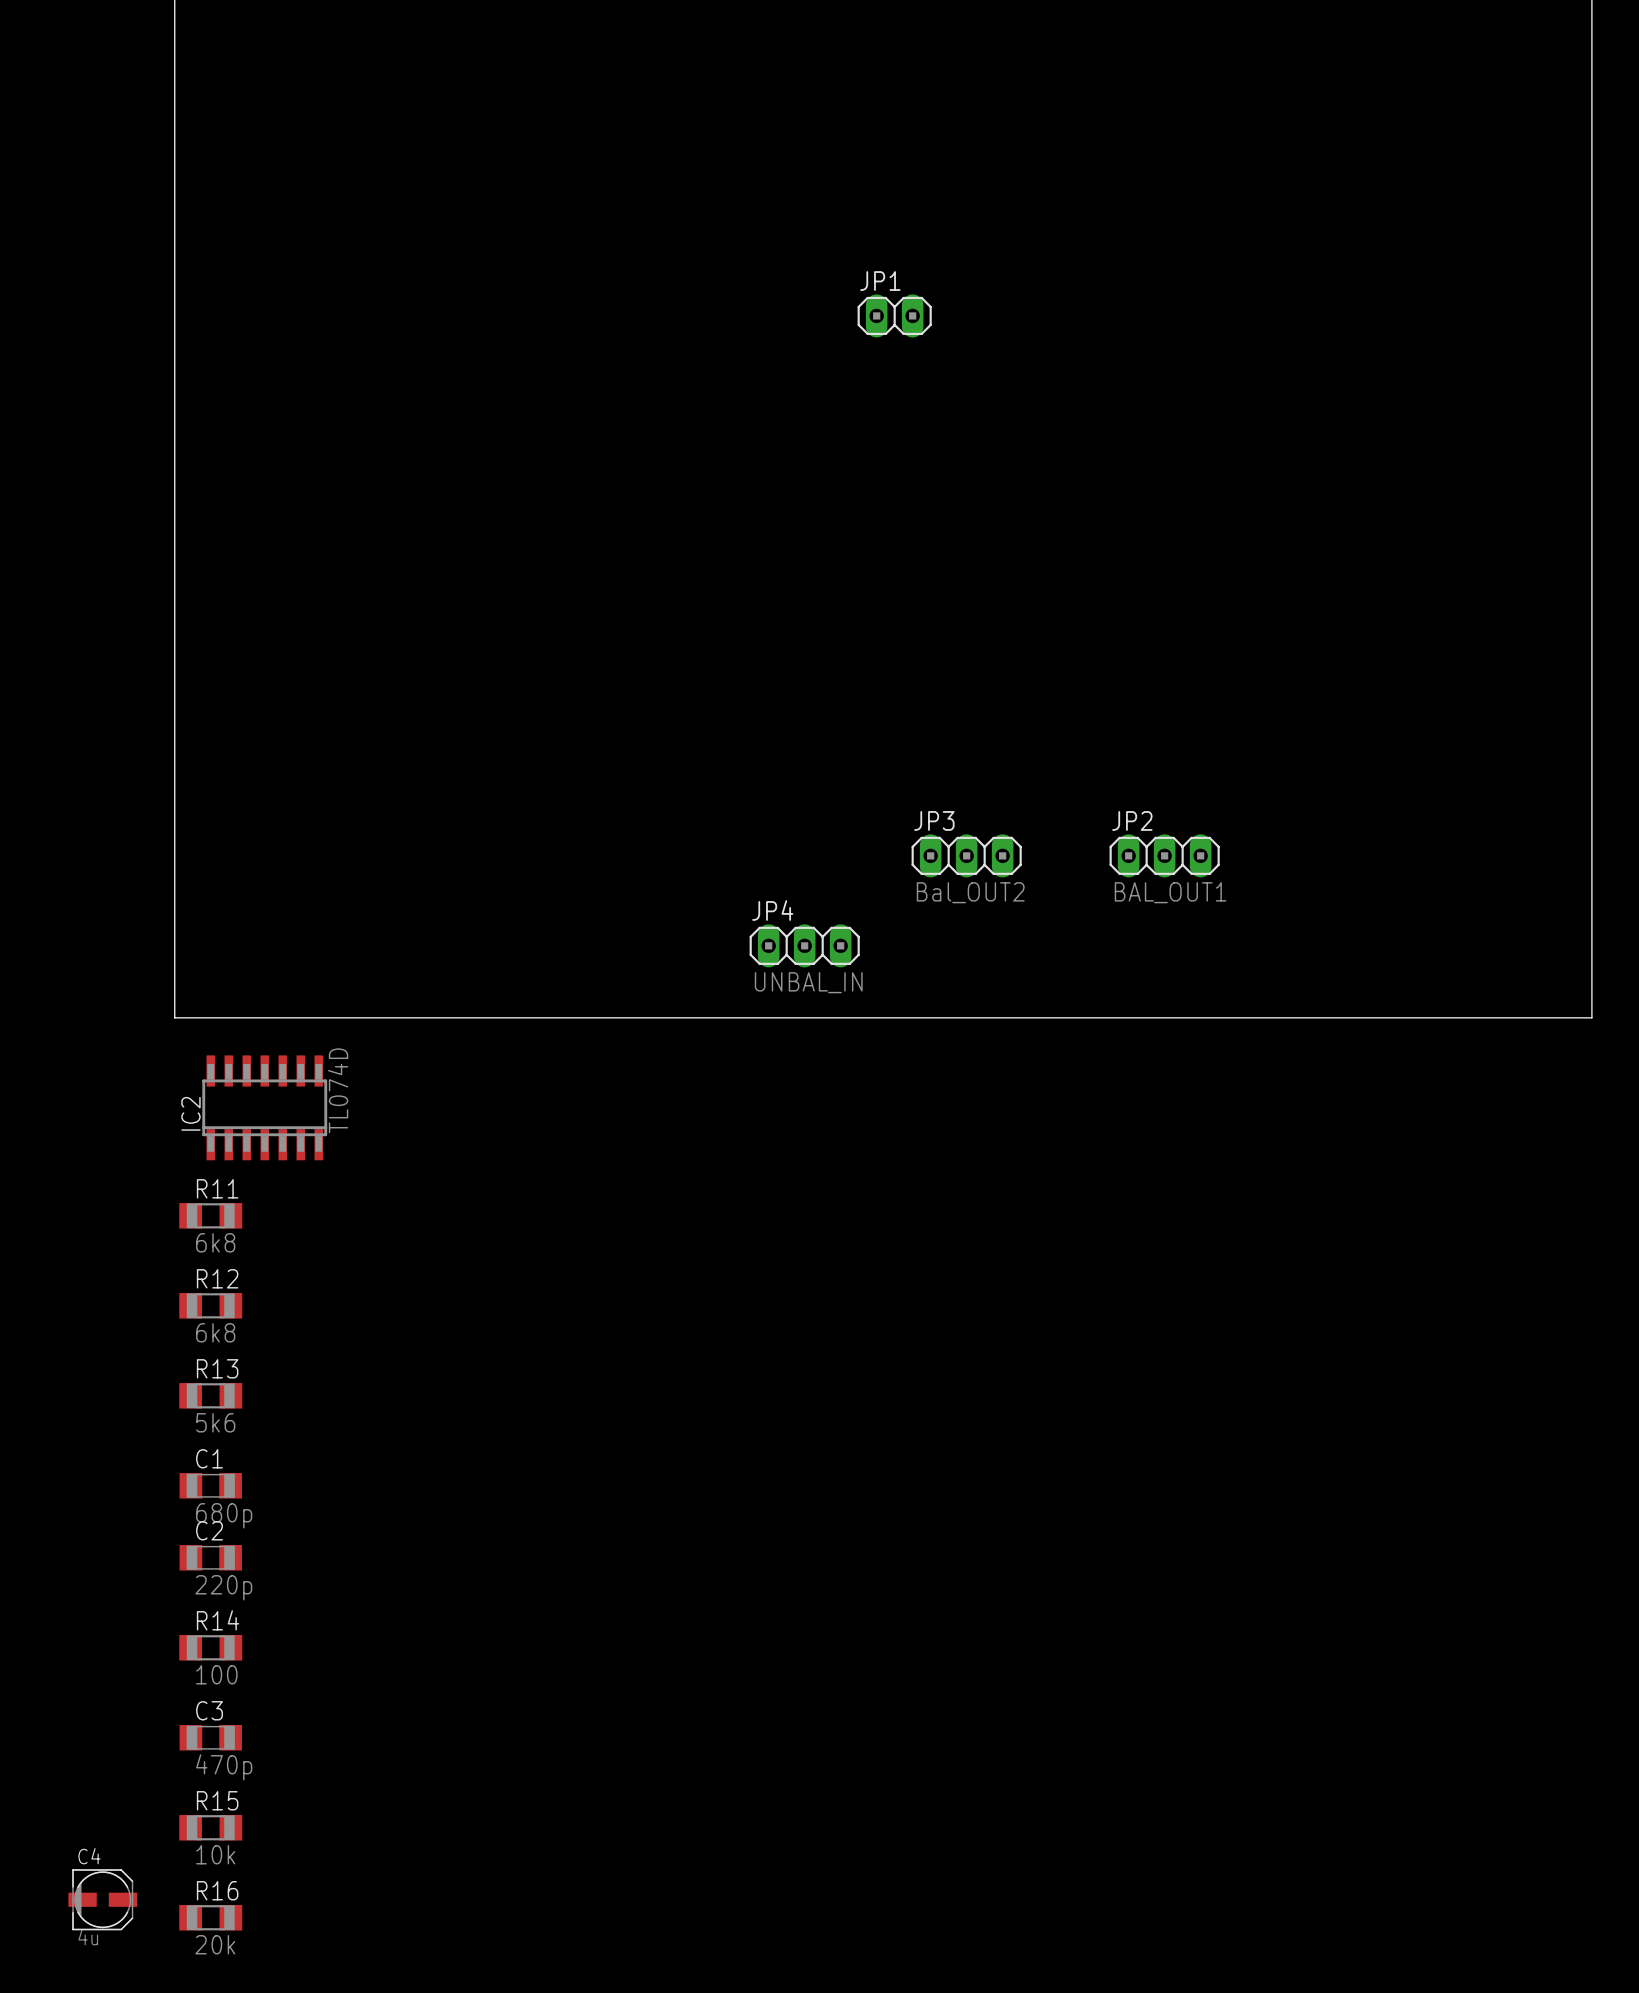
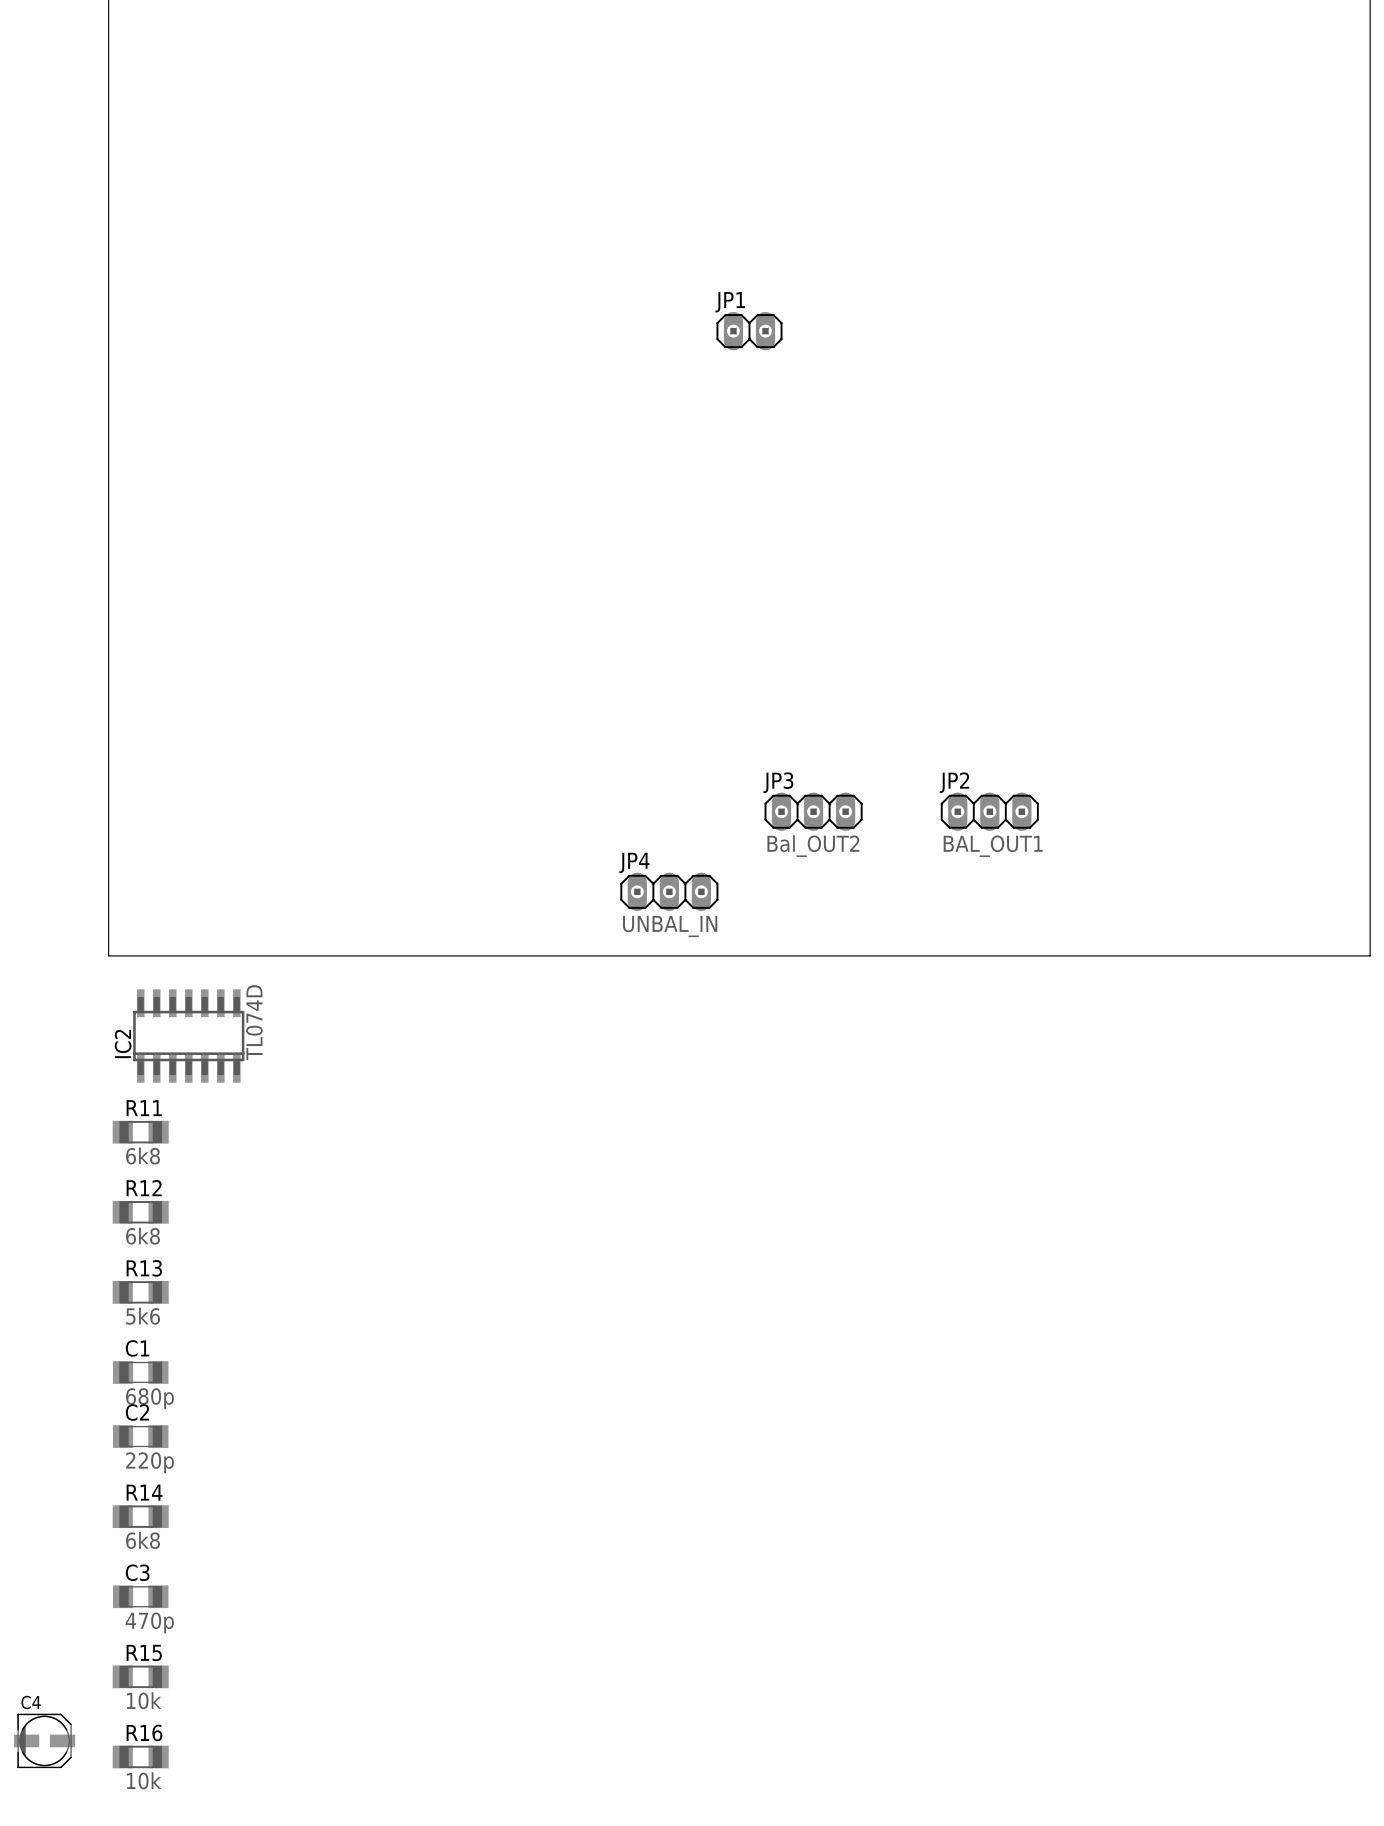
R14 value: 100 (216, 1674) -> 6k8 (143, 1540)
C4 value: 4u (88, 1937) -> none
R16 value: 20k (215, 1944) -> 10k (144, 1780)

